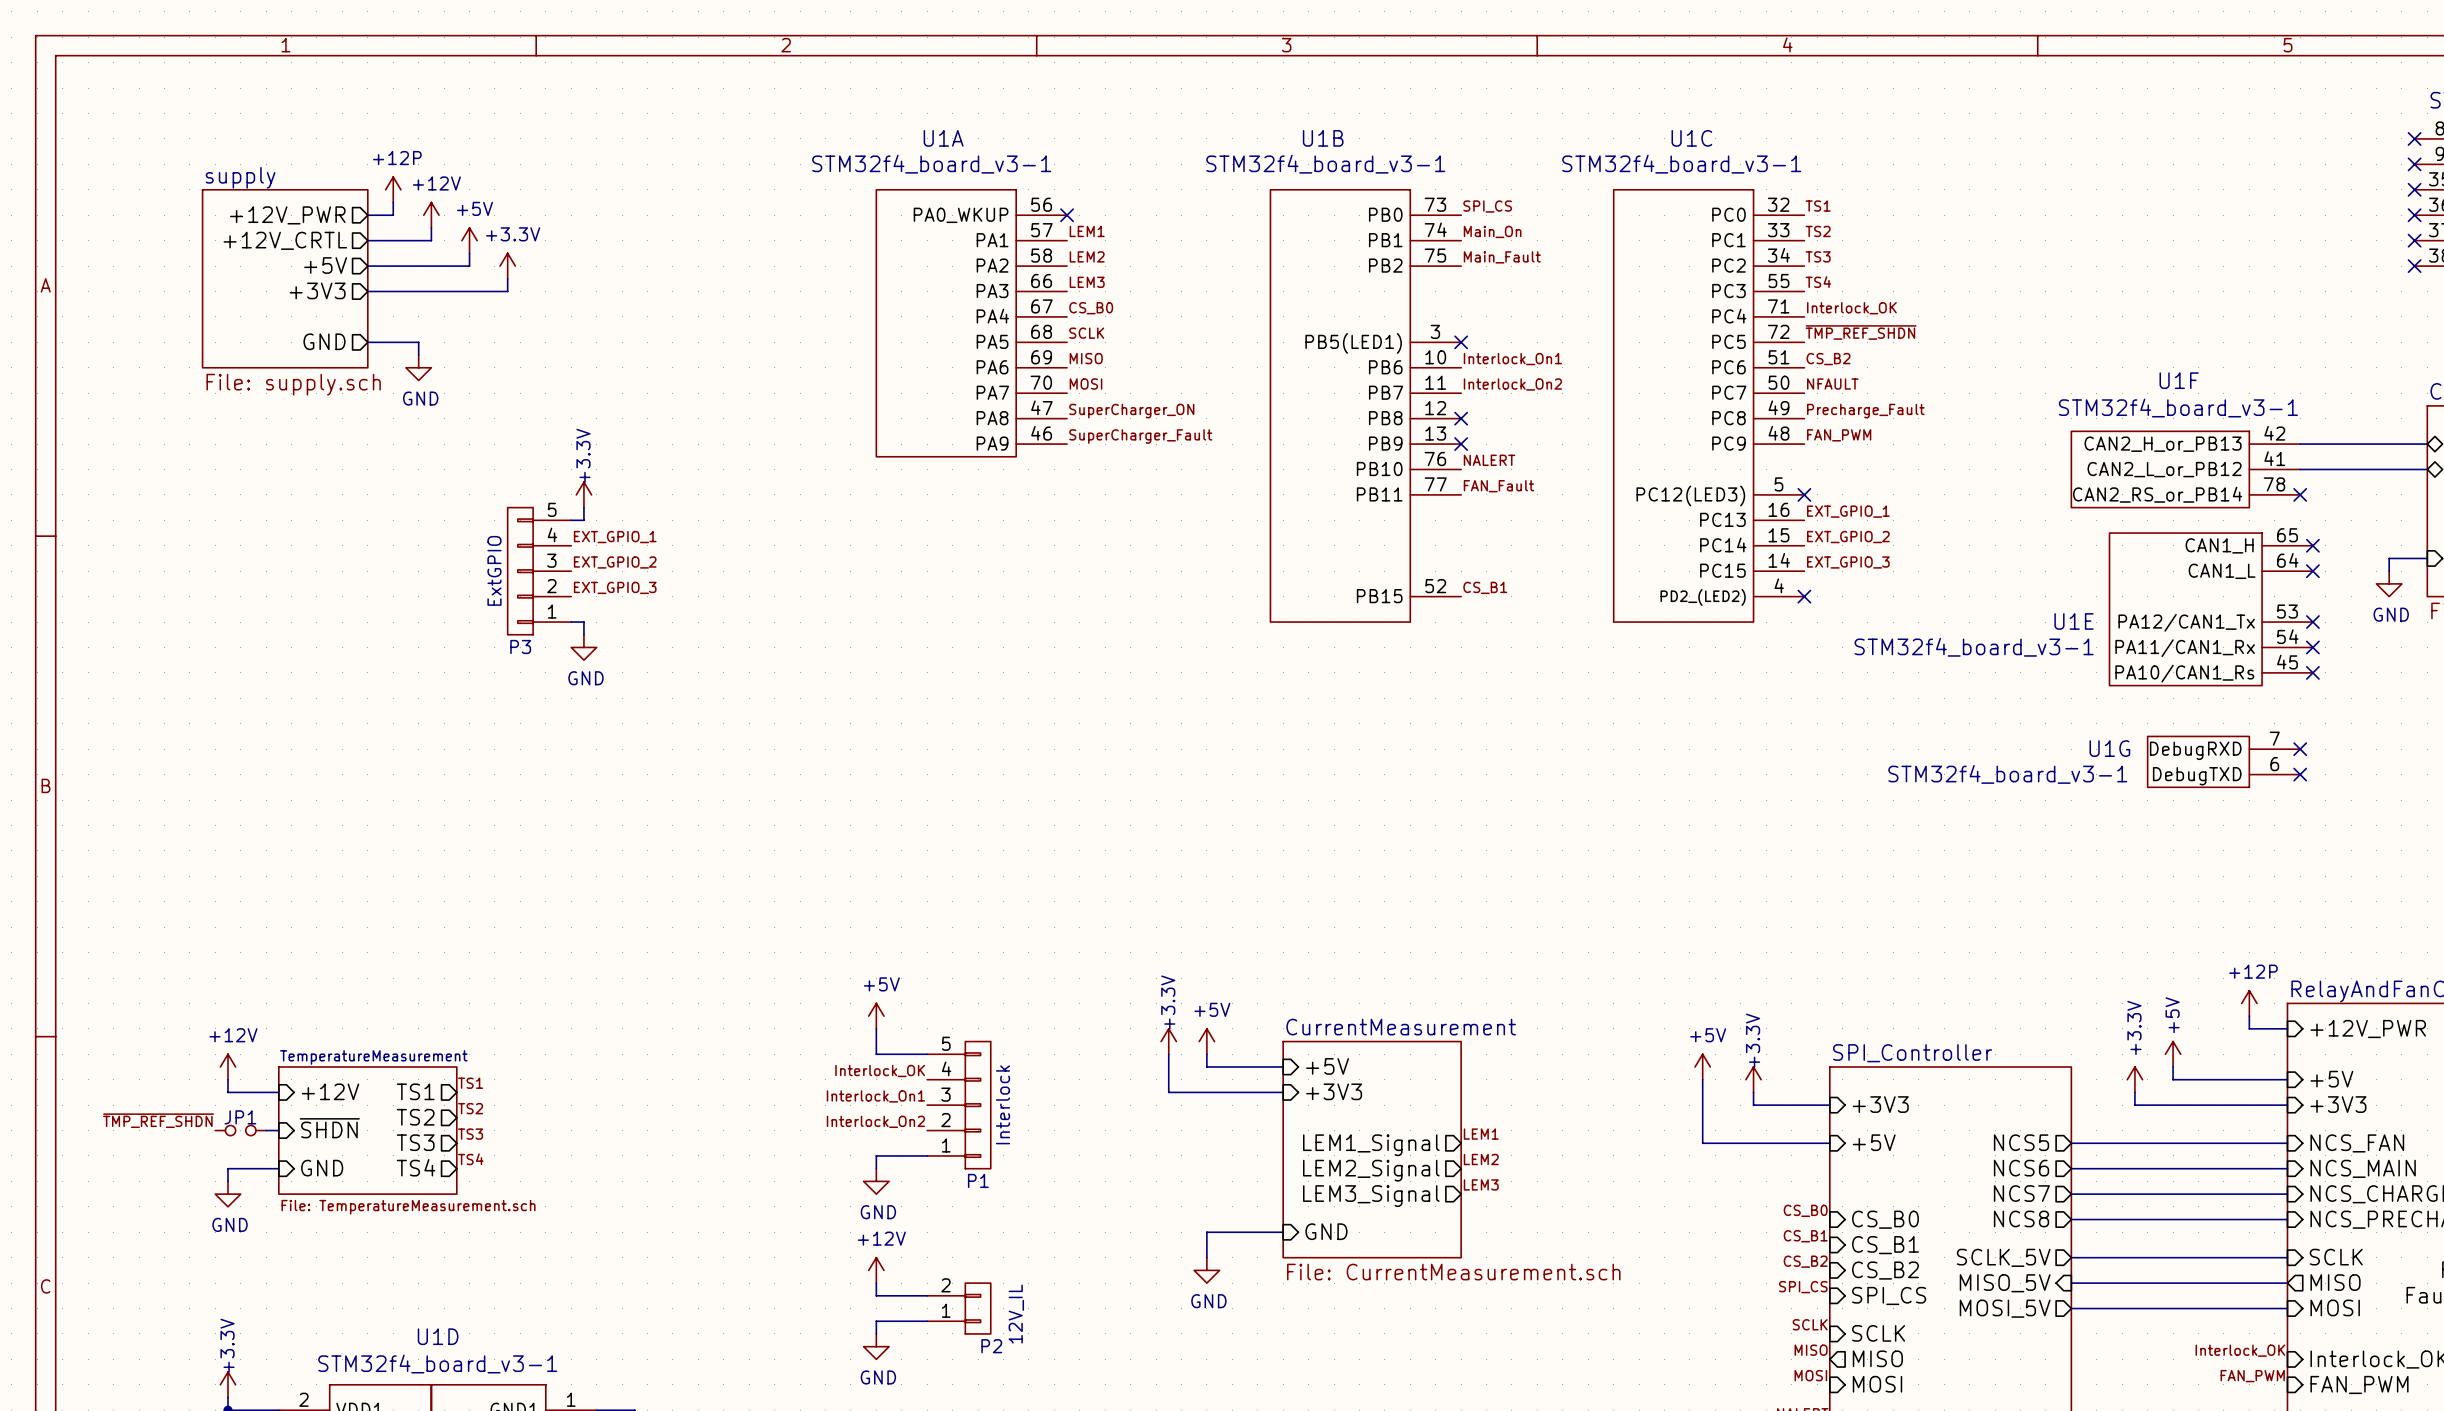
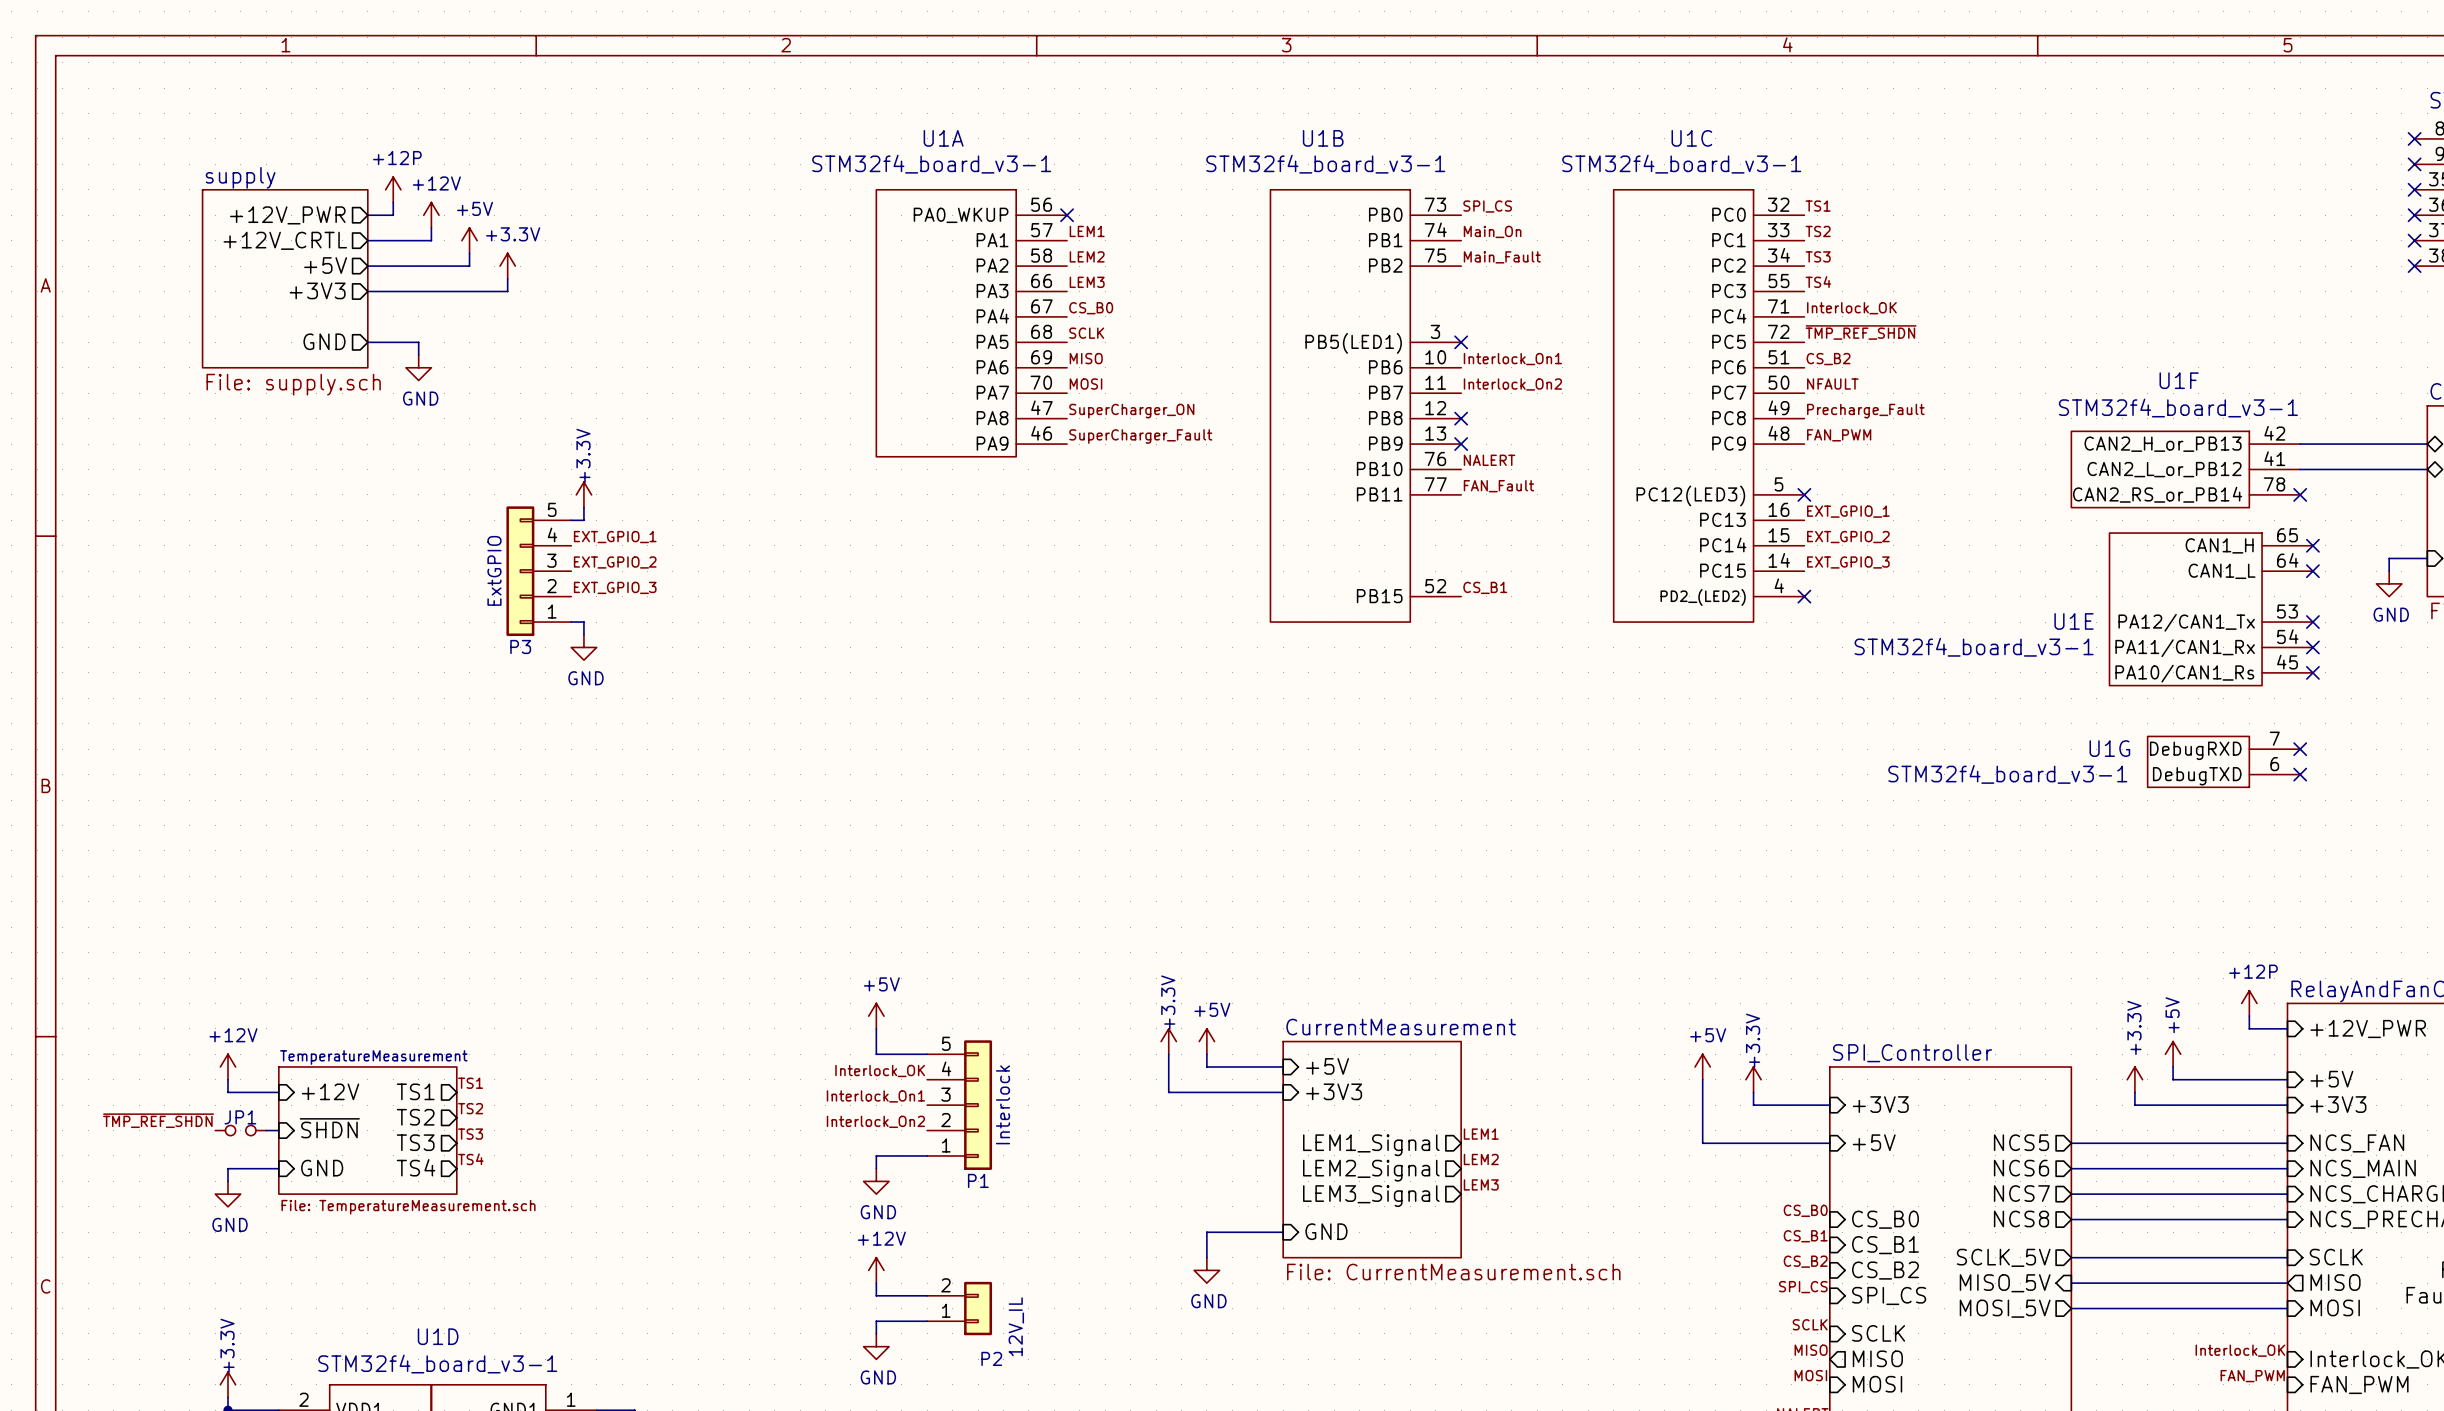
P3 symbol: [507, 507, 572, 635] -> [506, 506, 572, 637]
P1 symbol: [927, 1041, 991, 1169] -> [927, 1040, 993, 1170]
P2 symbol: [927, 1283, 991, 1334] -> [927, 1281, 993, 1336]

